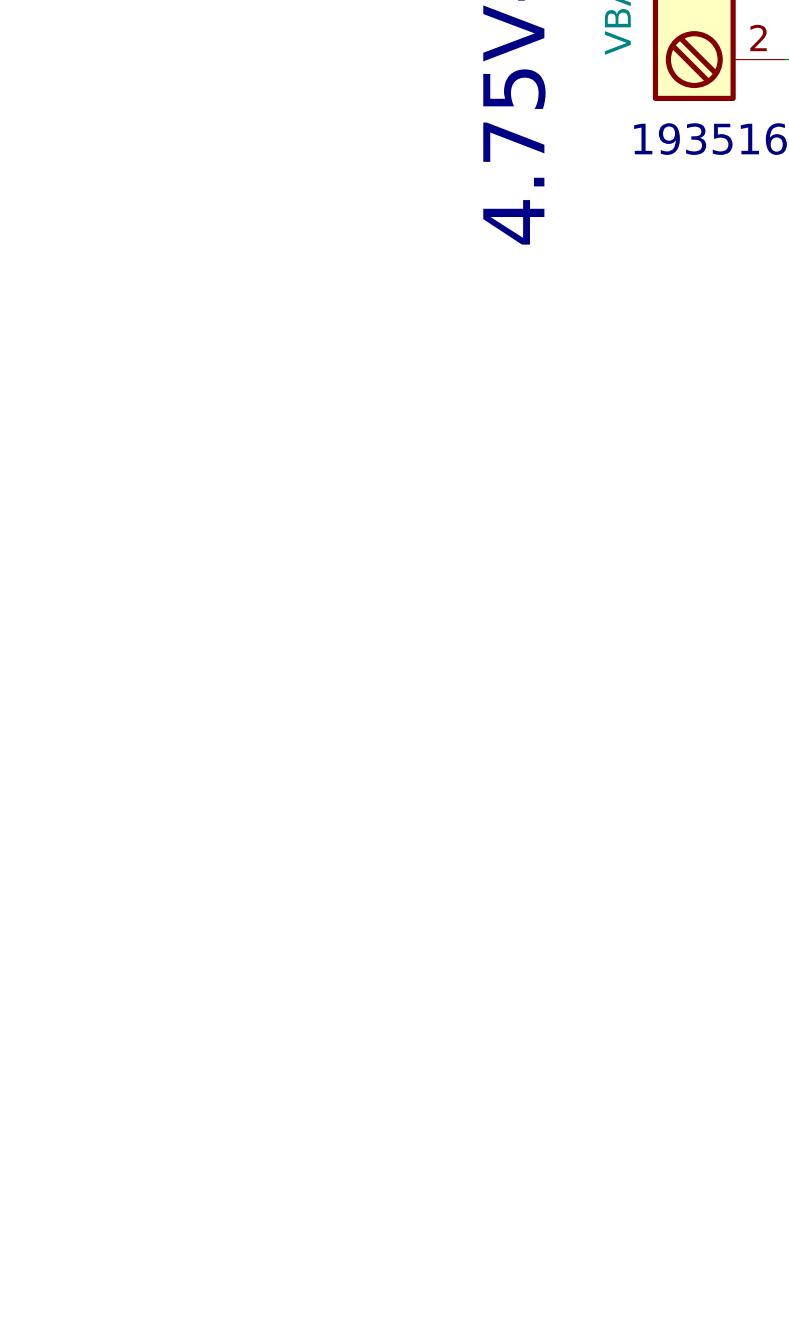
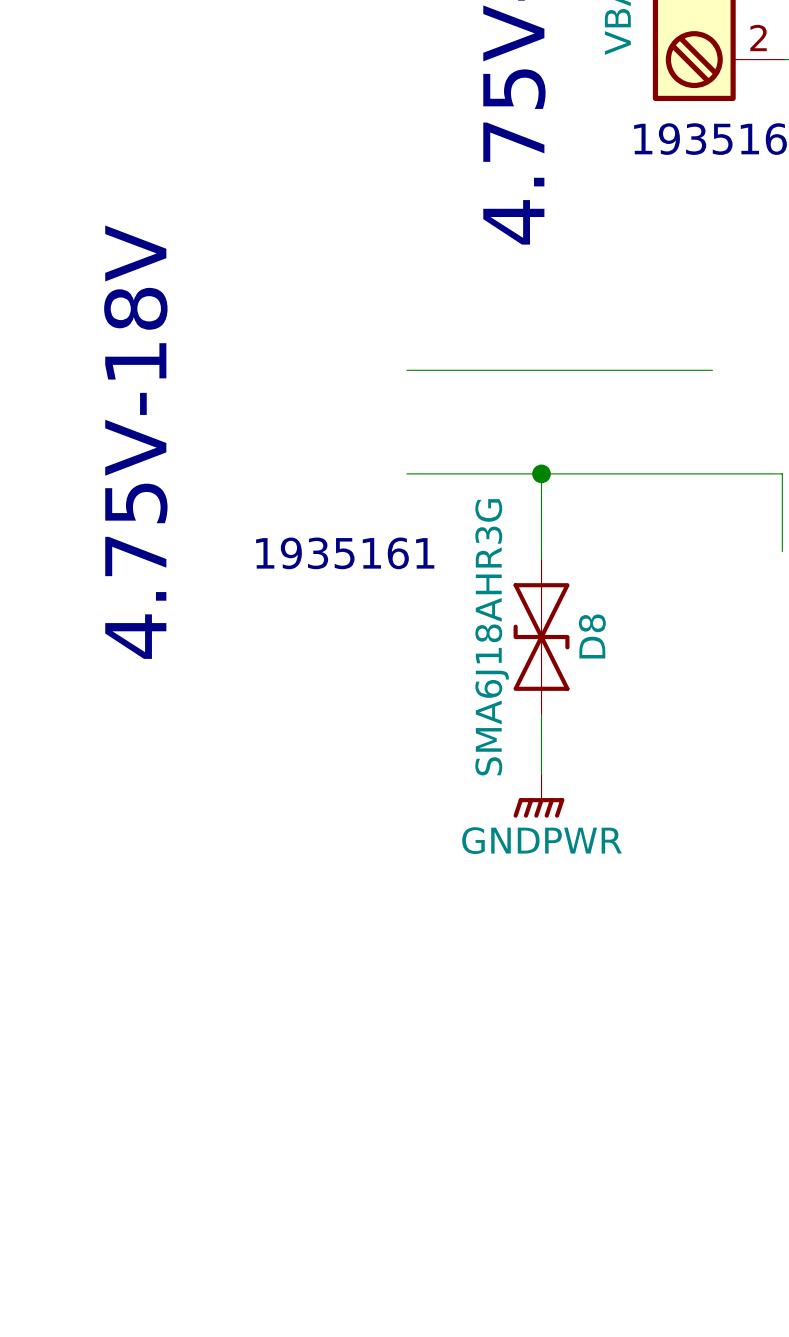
wire: none -> (406, 370) (712, 370)
text: none -> 4.75V-18V (135, 442)
wire: none -> (406, 473) (782, 473) (782, 551)
wire: none -> (541, 473) (541, 559)
junction: none -> (541, 473)
text: none -> 1935161 (345, 553)
D8: none -> SMA6J18AHR3G (541, 637)
wire: none -> (541, 714) (541, 774)
power symbol: none -> GNDPWR (538, 795)

